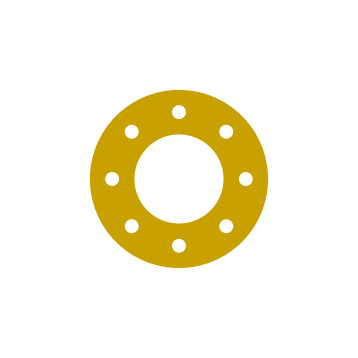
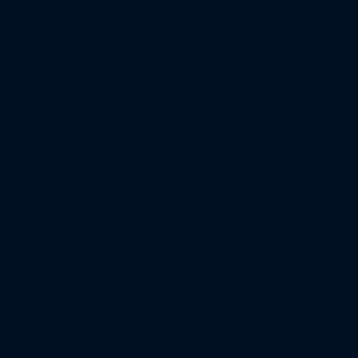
part: (178, 178) -> none

